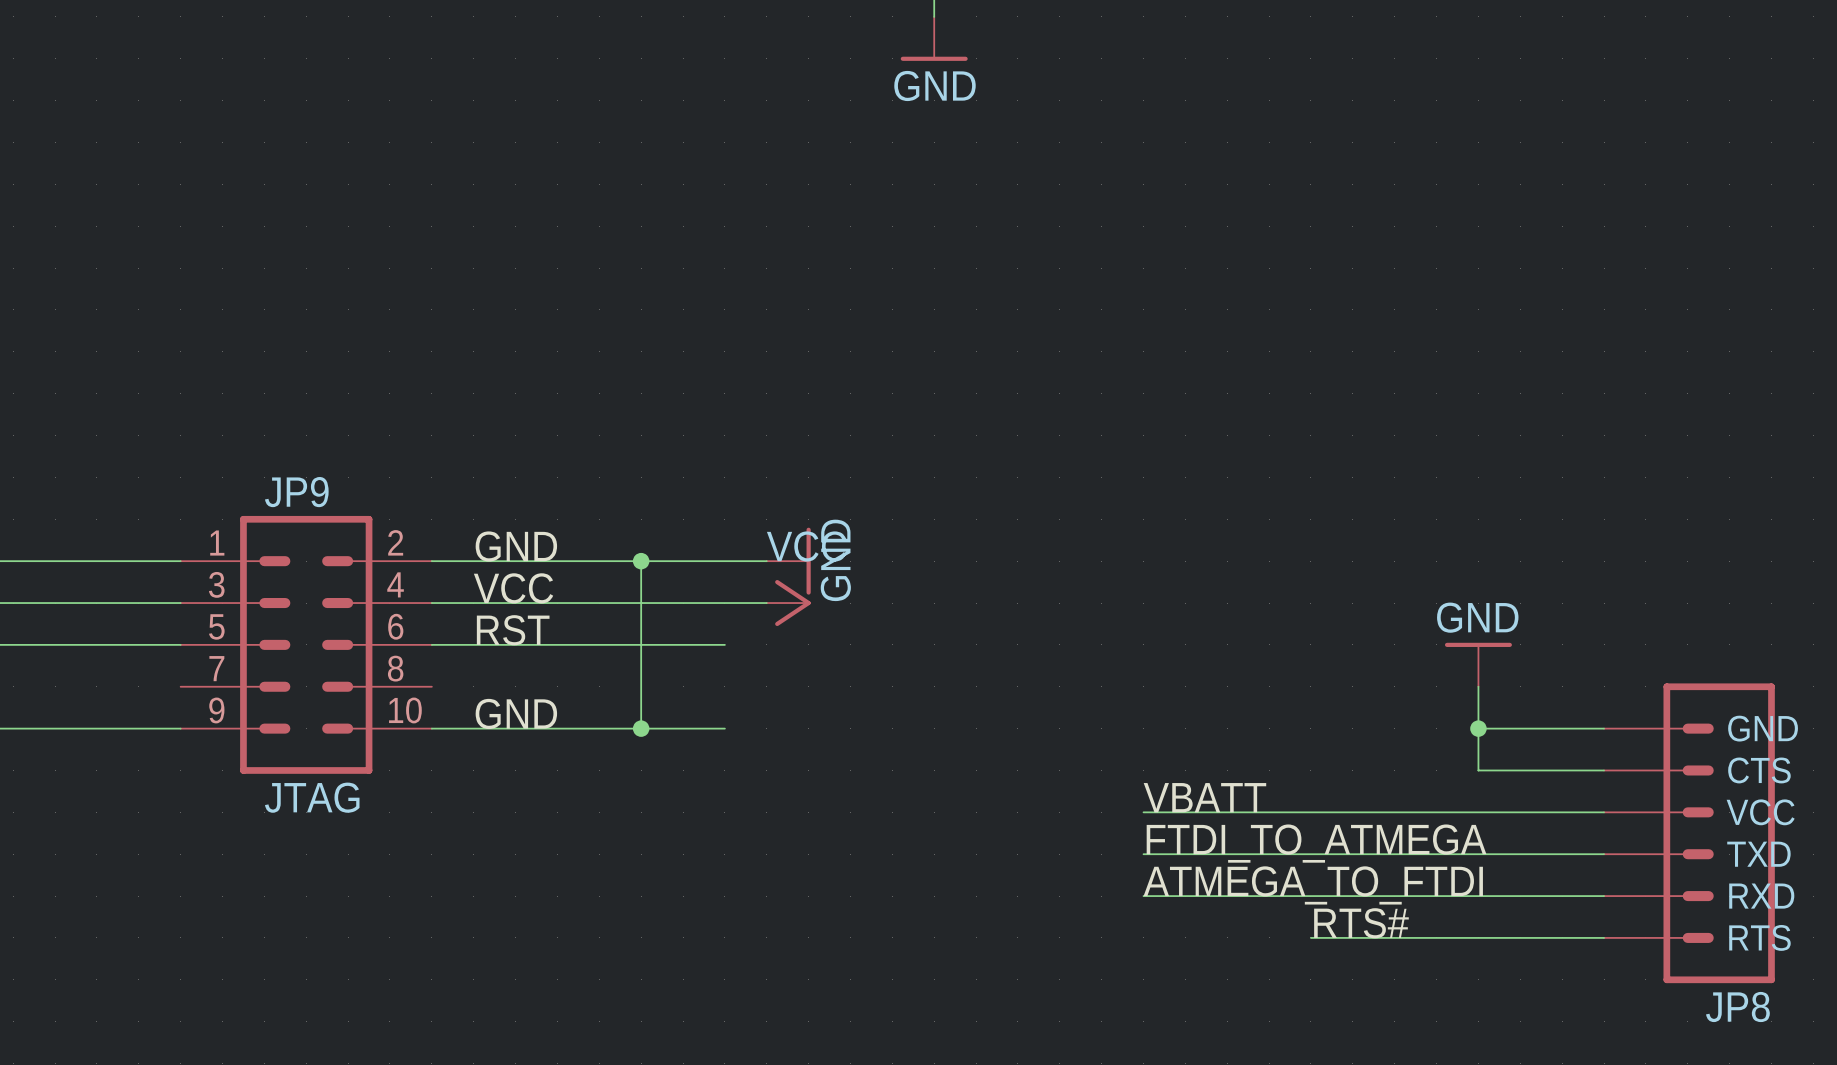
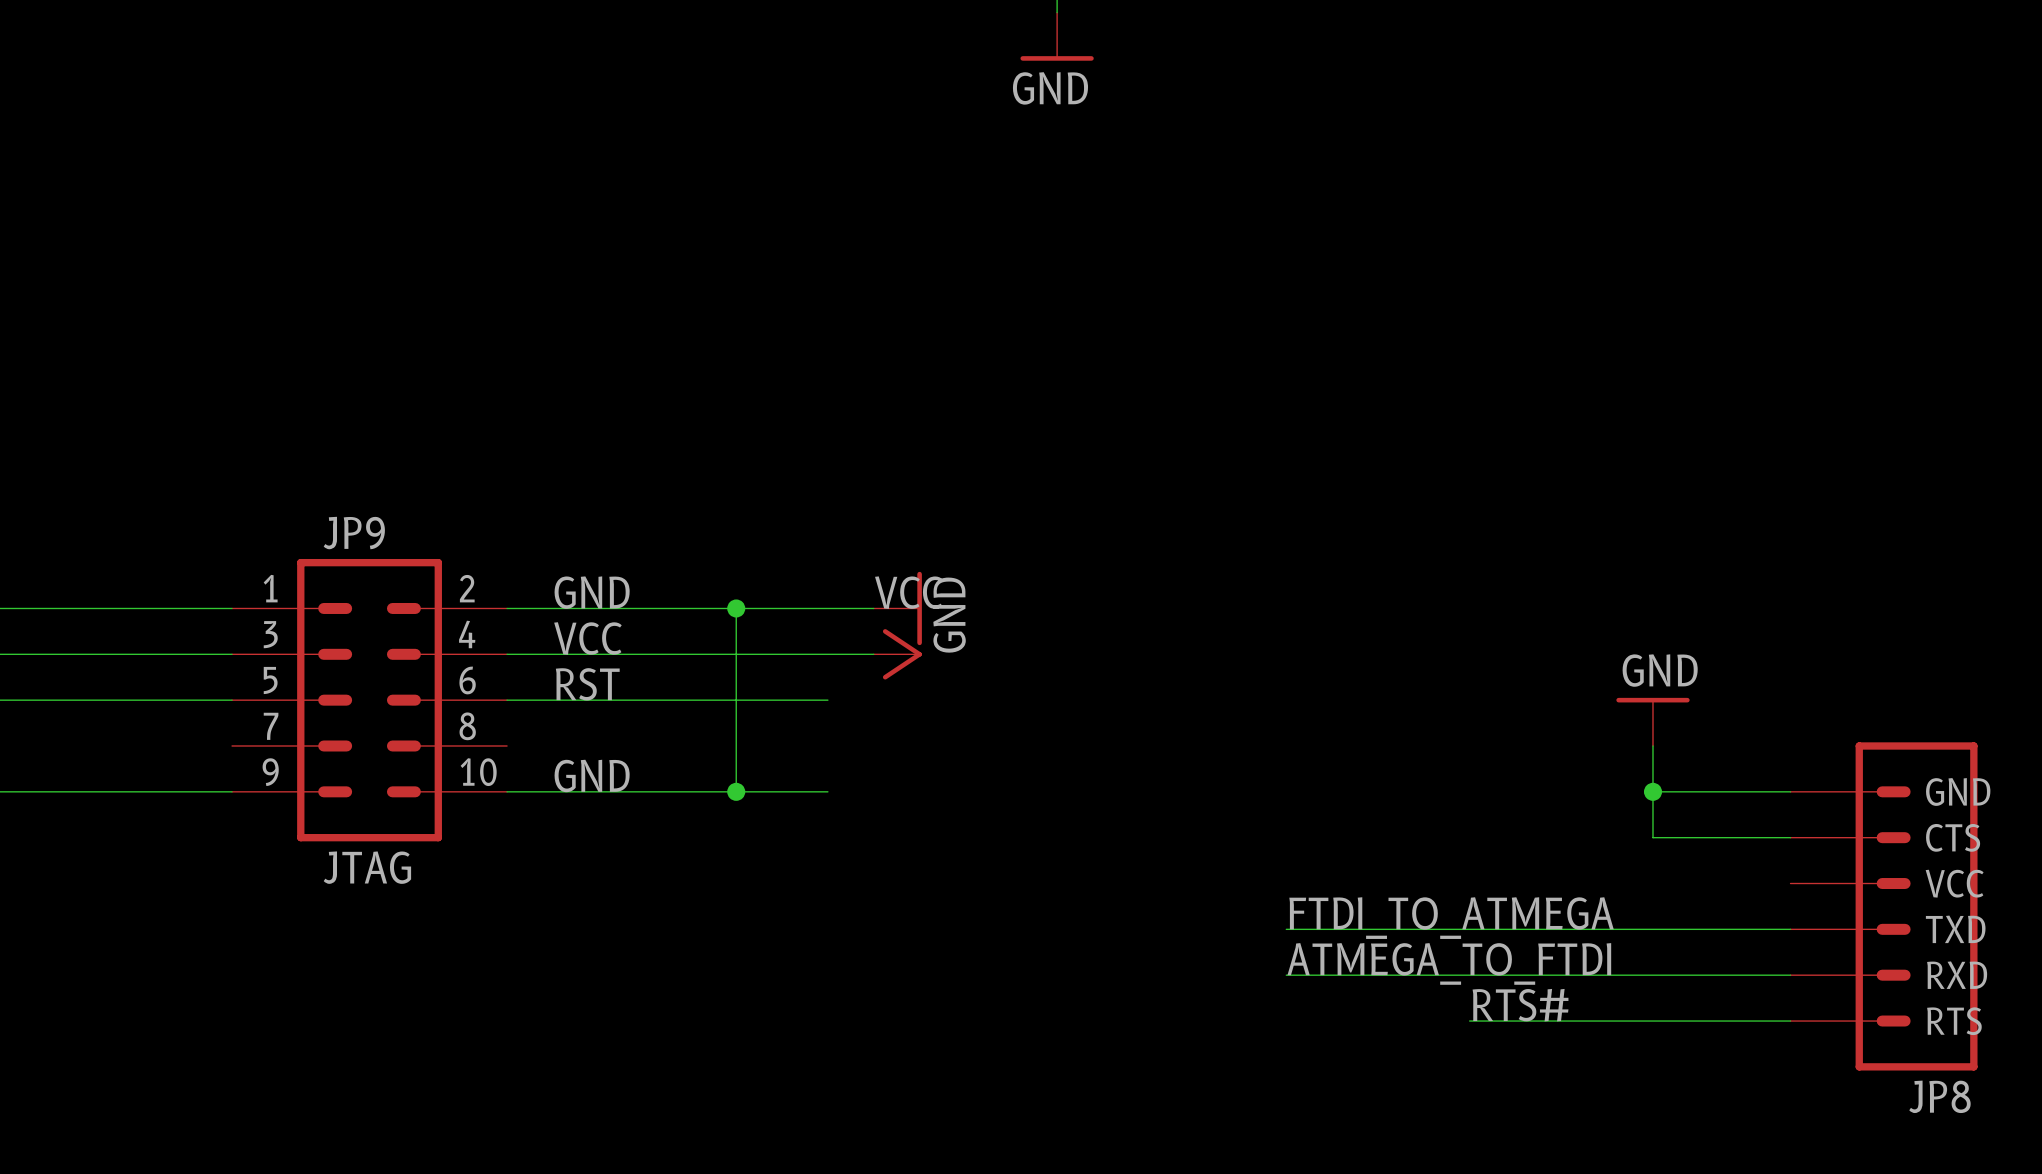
label: VBATT (1204, 797) -> none
wire: (1143, 812) (1604, 812) -> none

